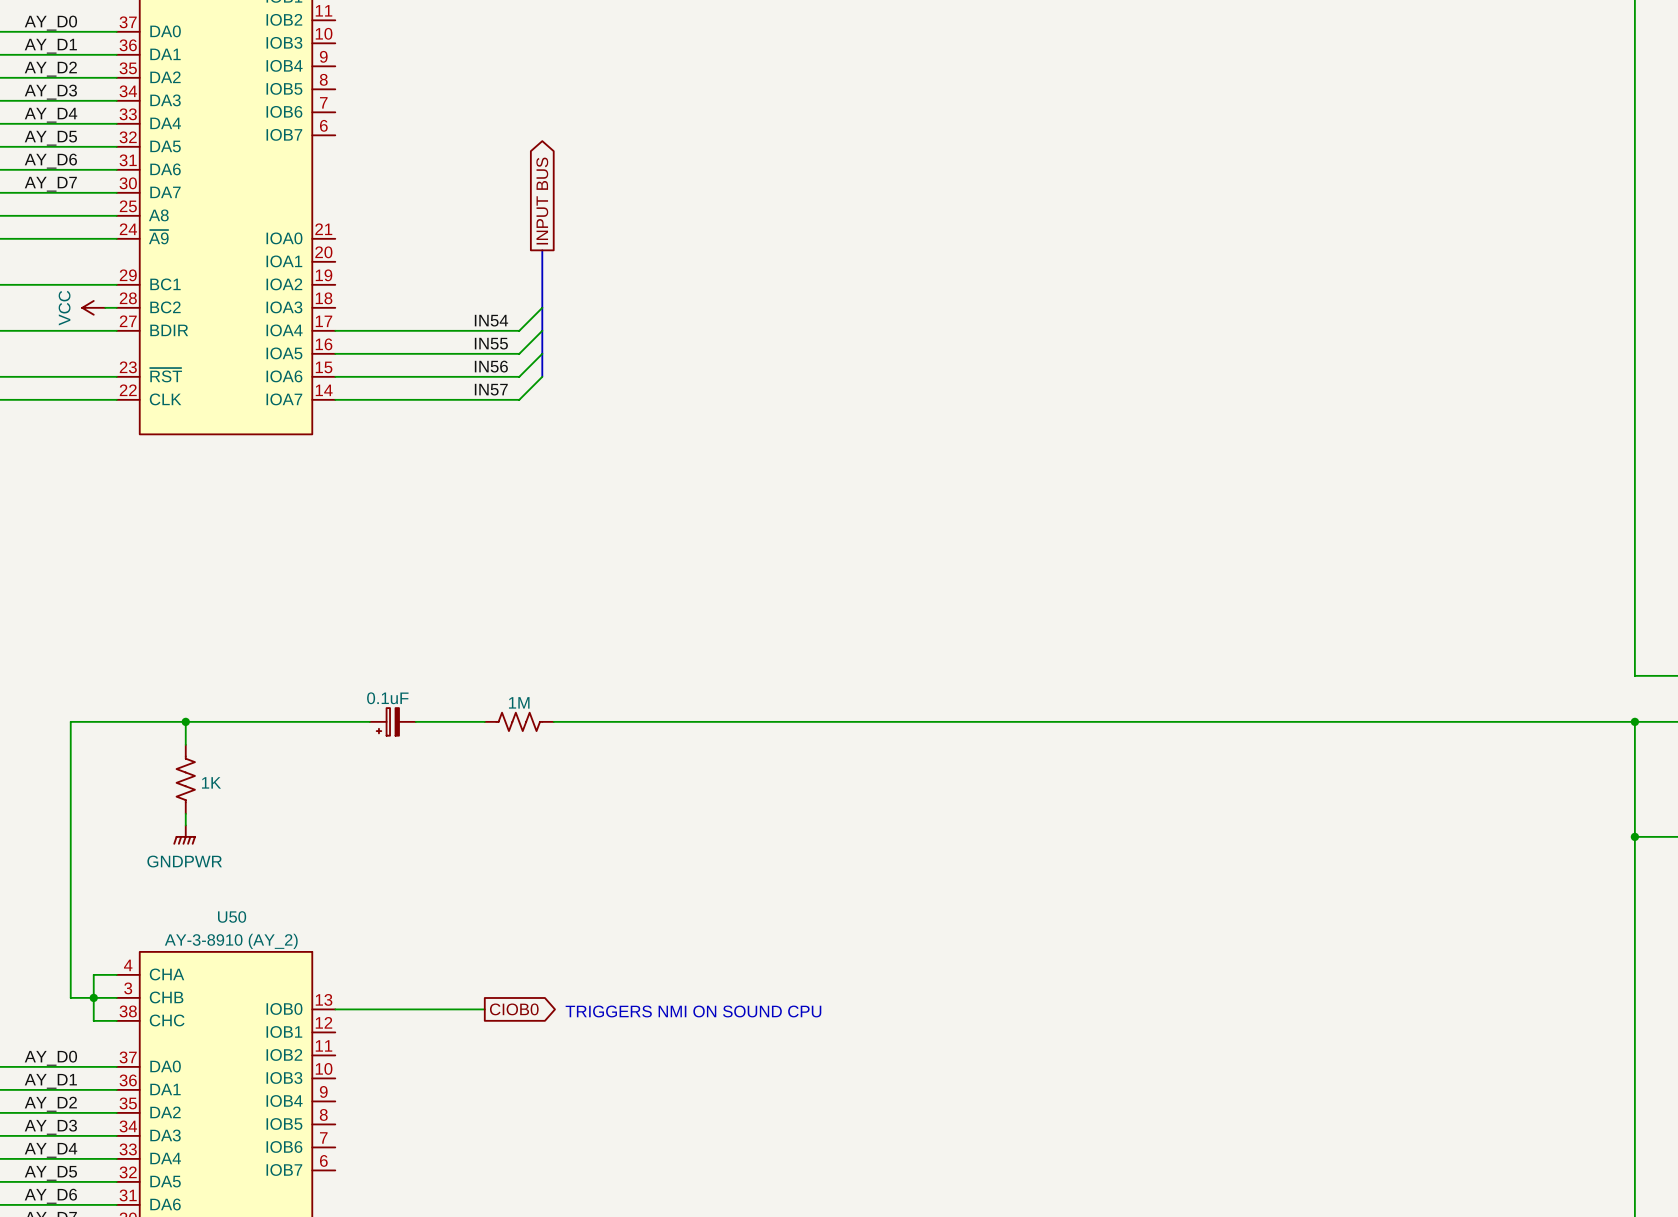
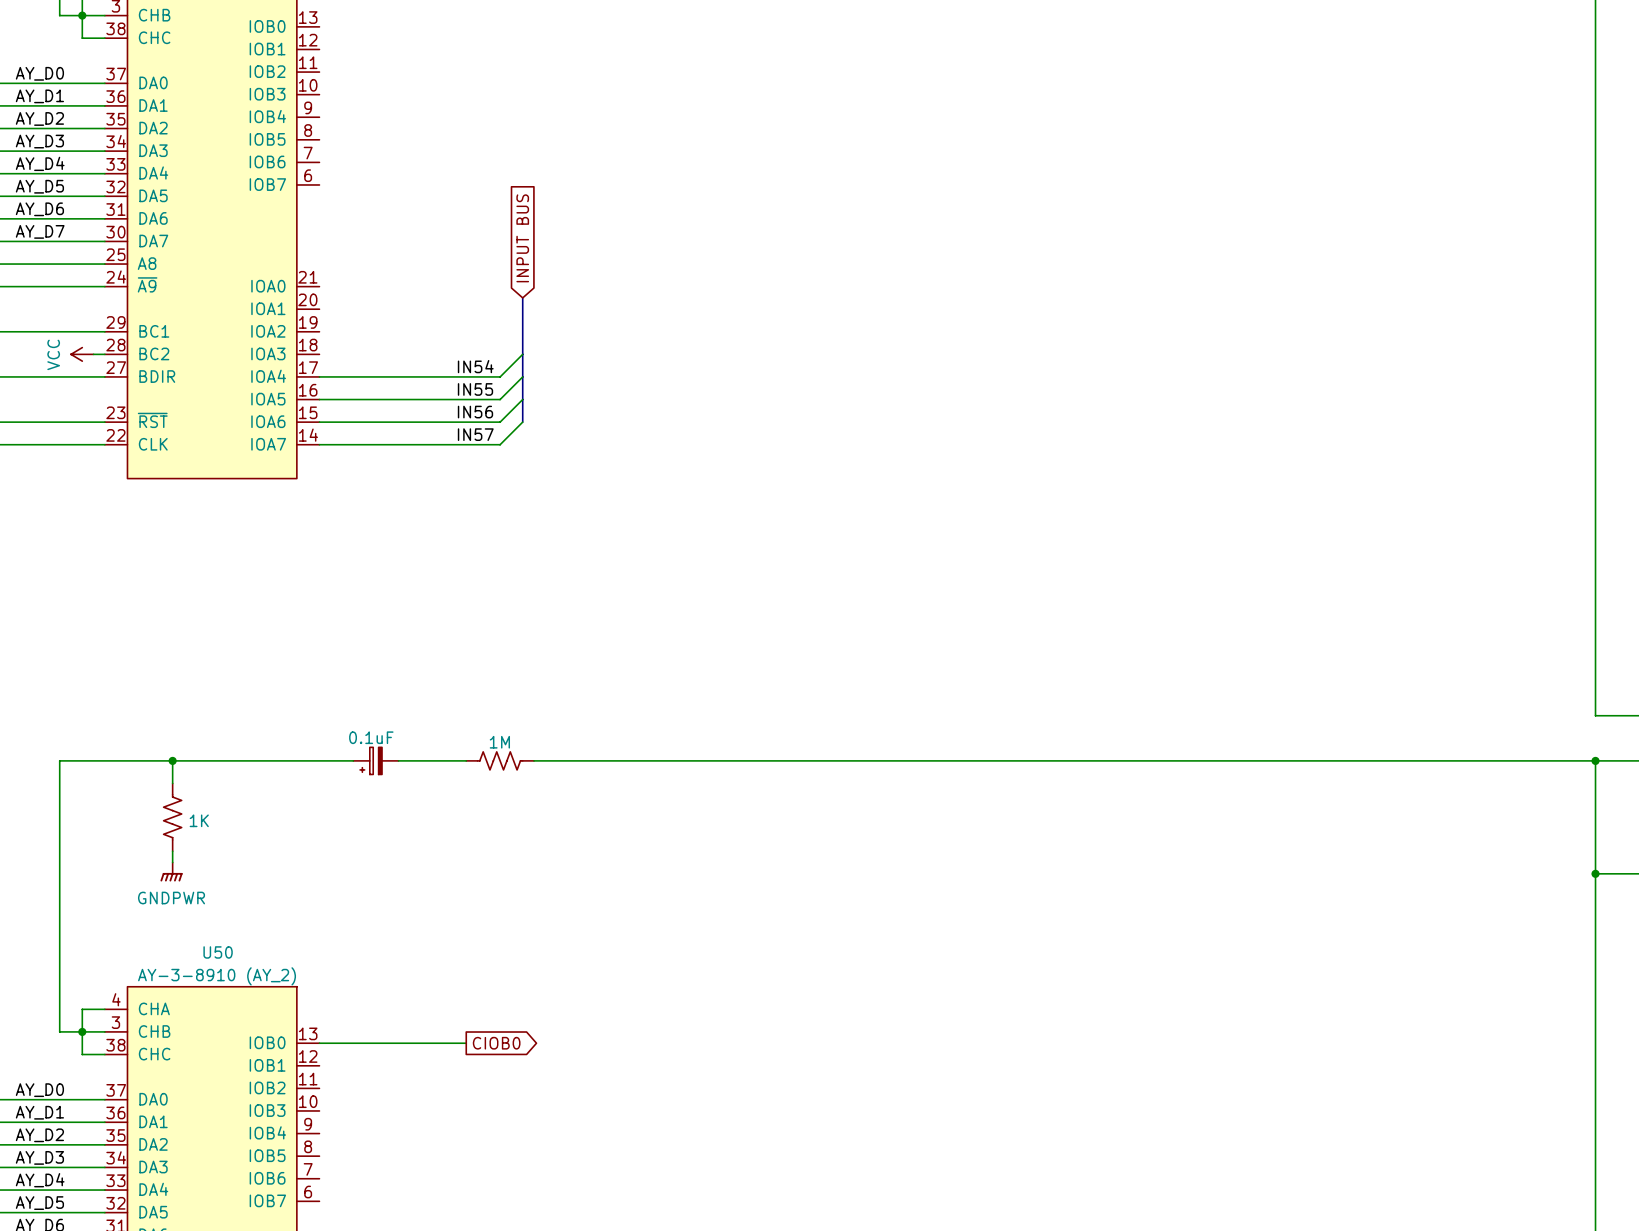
global label shape: output (542, 201) -> input (522, 238)
text: TRIGGERS NMI ON SOUND CPU (693, 1011) -> none

